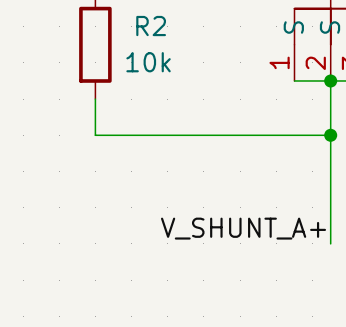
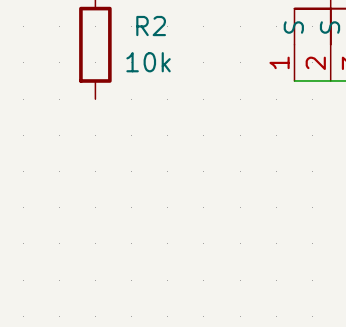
wire: (330, 80) (330, 243) -> none
junction: (330, 80) -> none
wire: (95, 99) (95, 135) (330, 135) -> none
junction: (330, 135) -> none
label: V_SHUNT_A+ (243, 228) -> none

